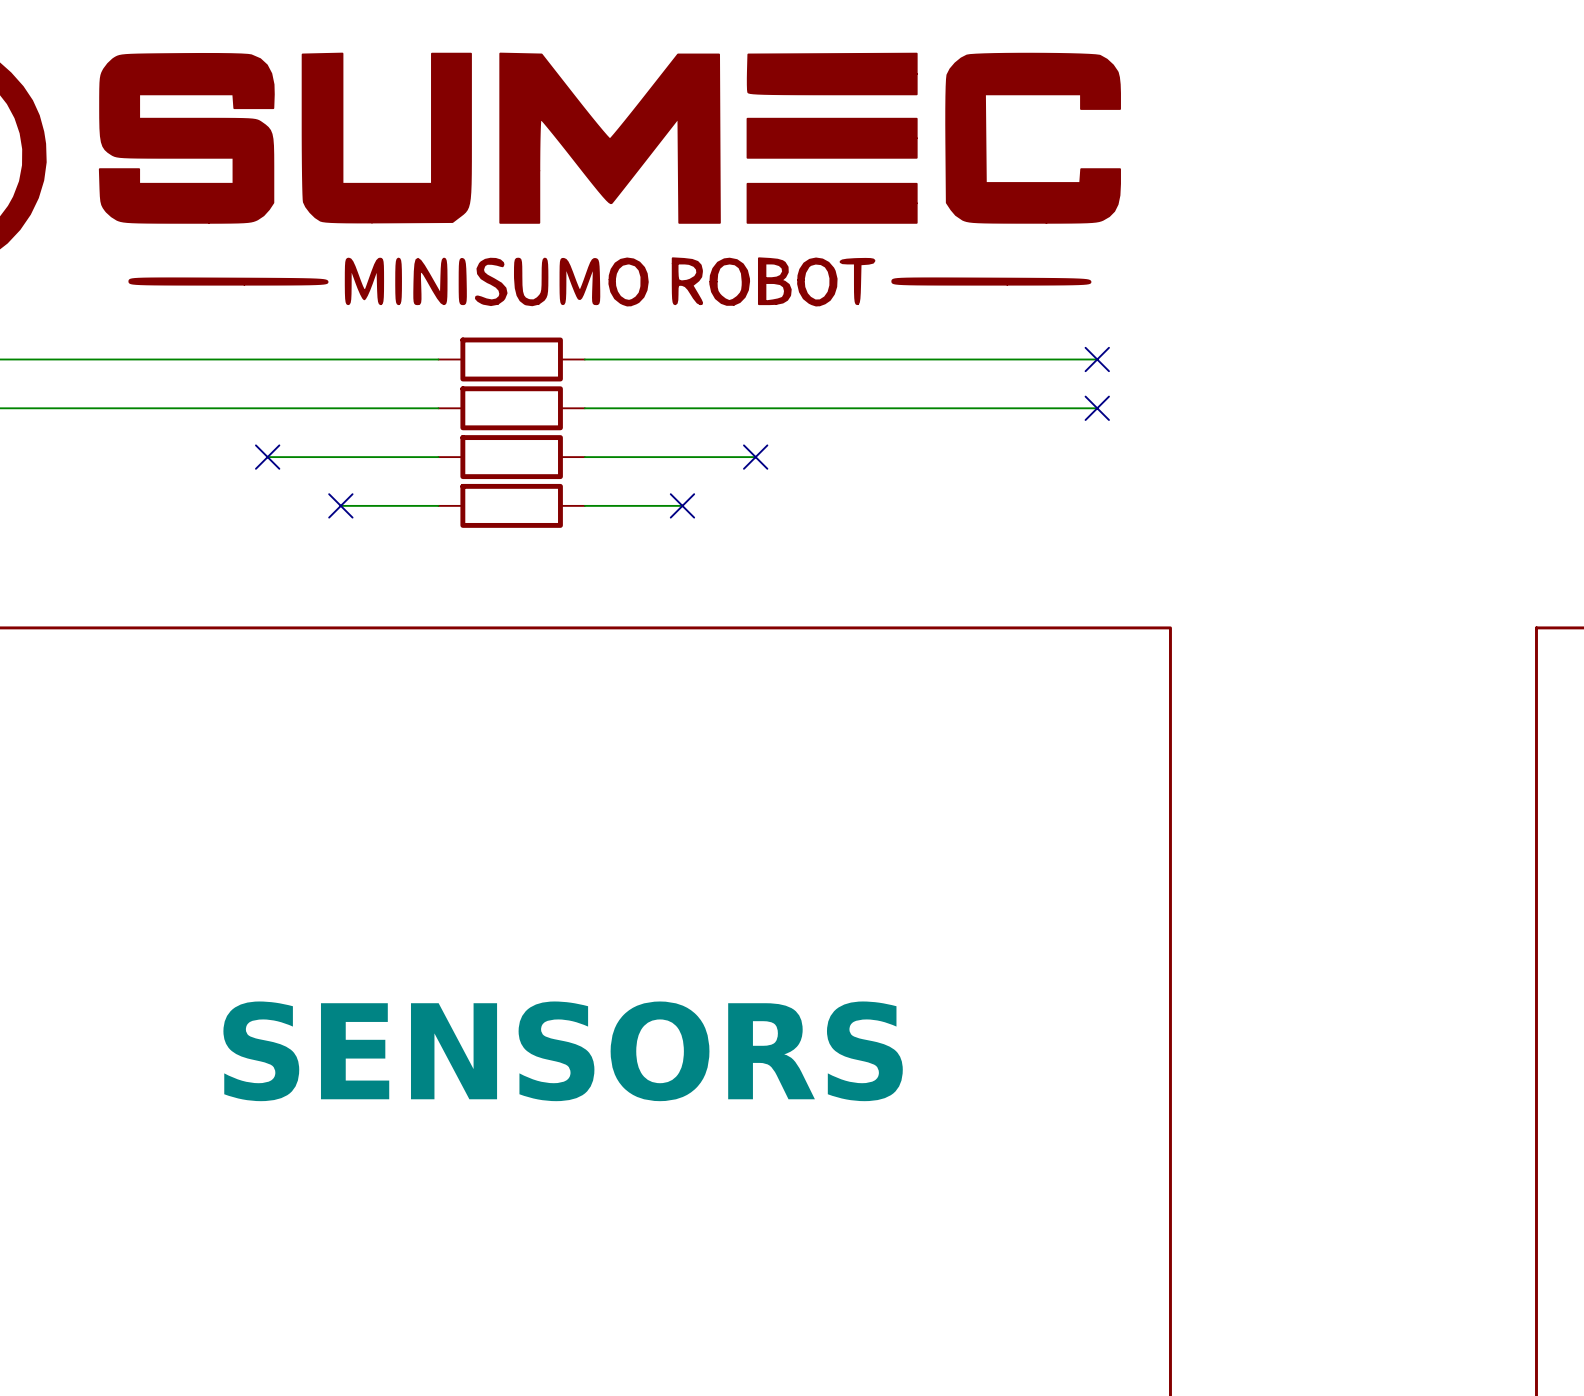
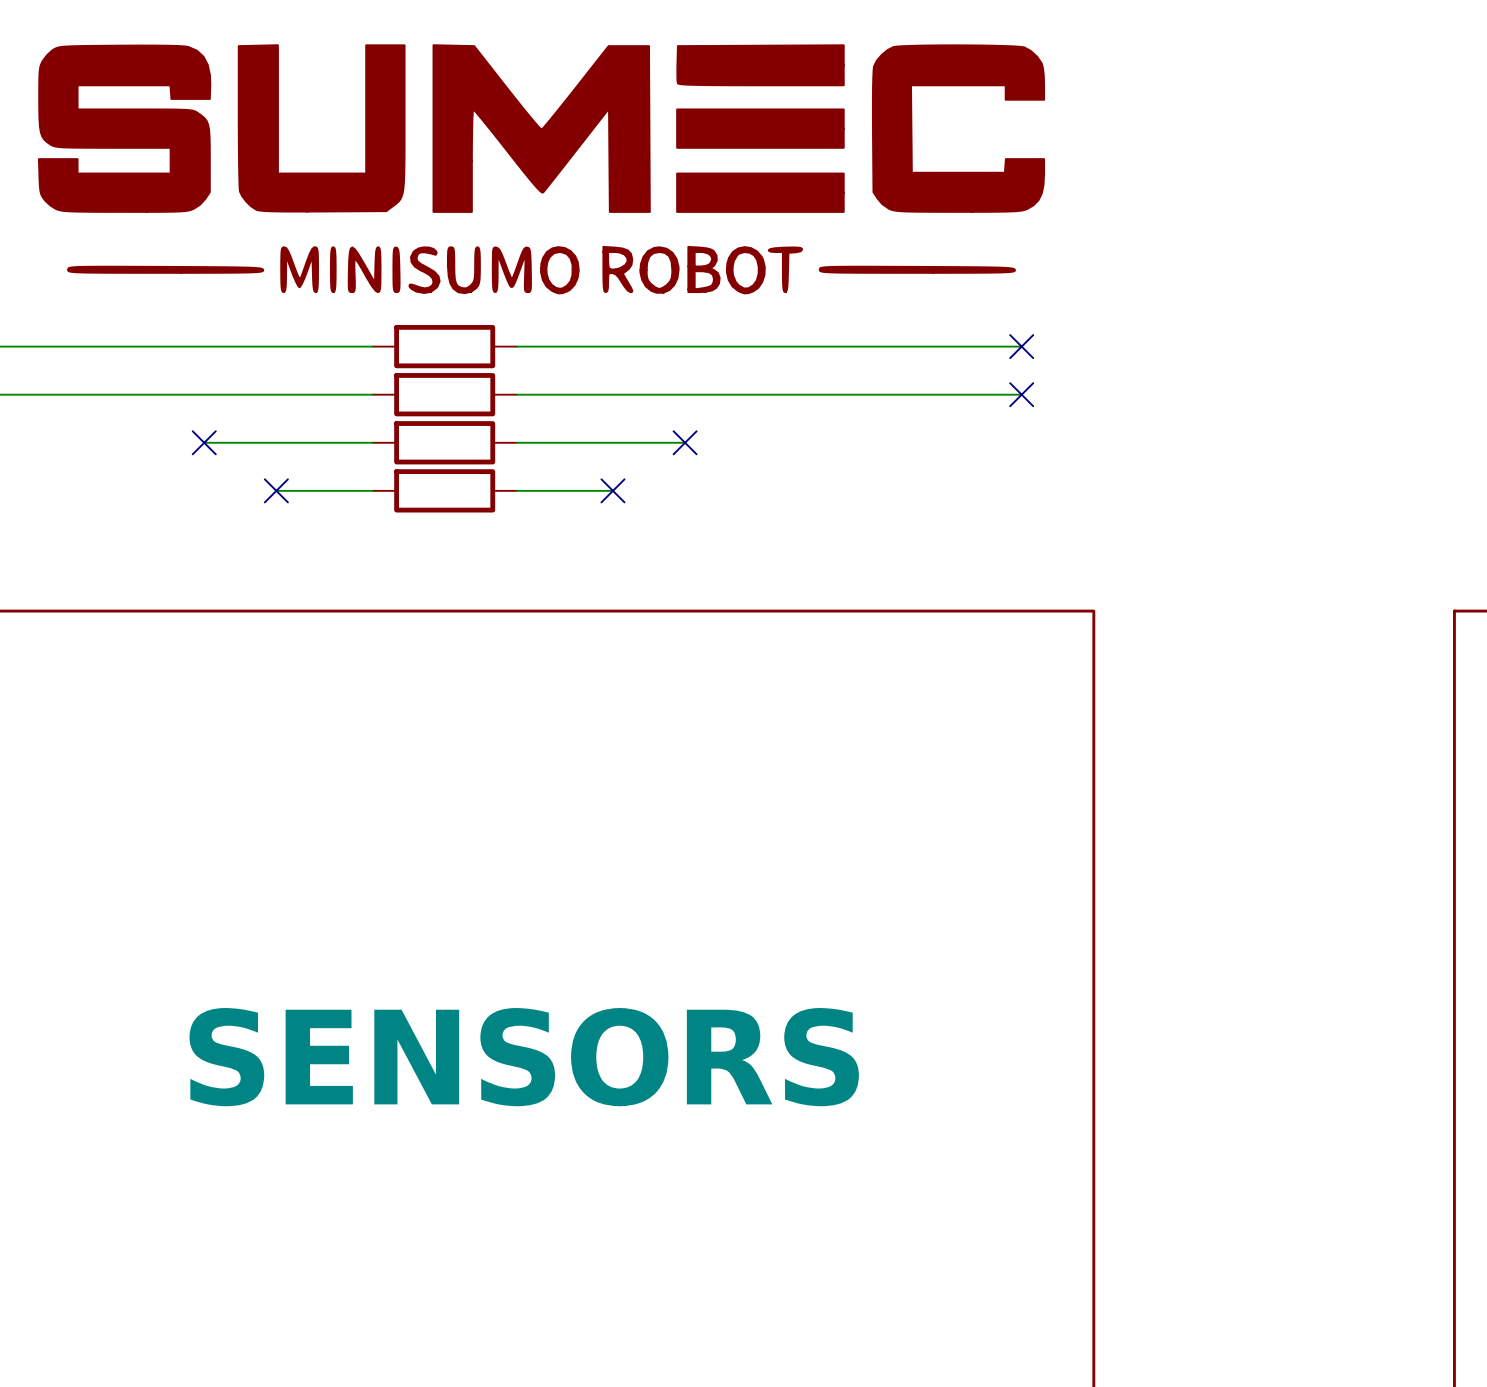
sheet SENSORS name position: SENSORS (563, 1051) -> SENSORS (524, 1057)

